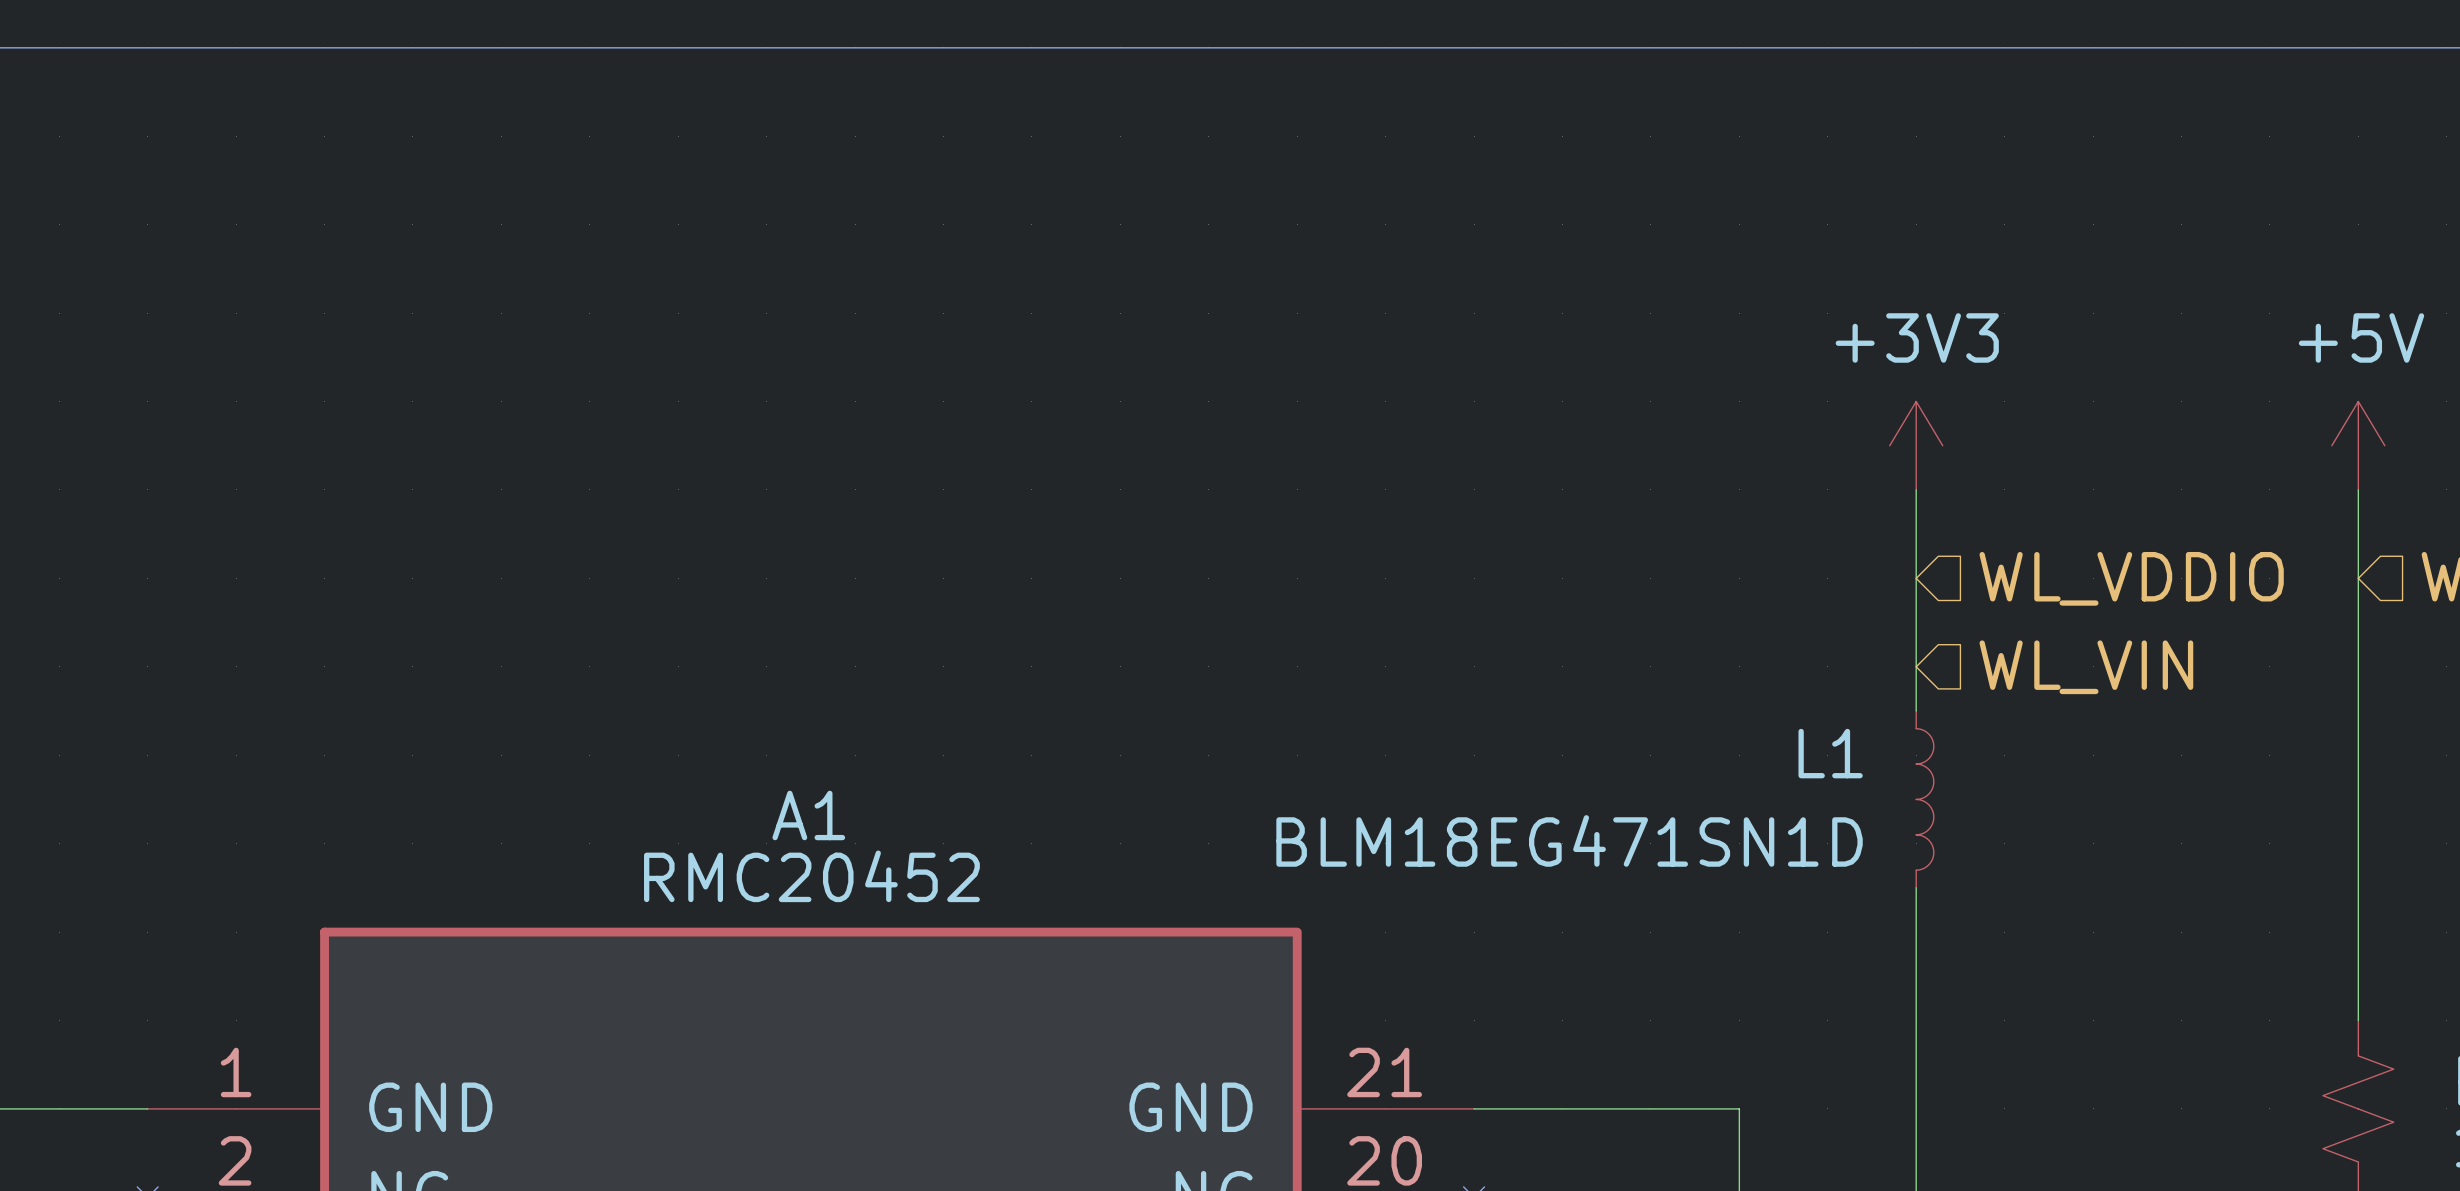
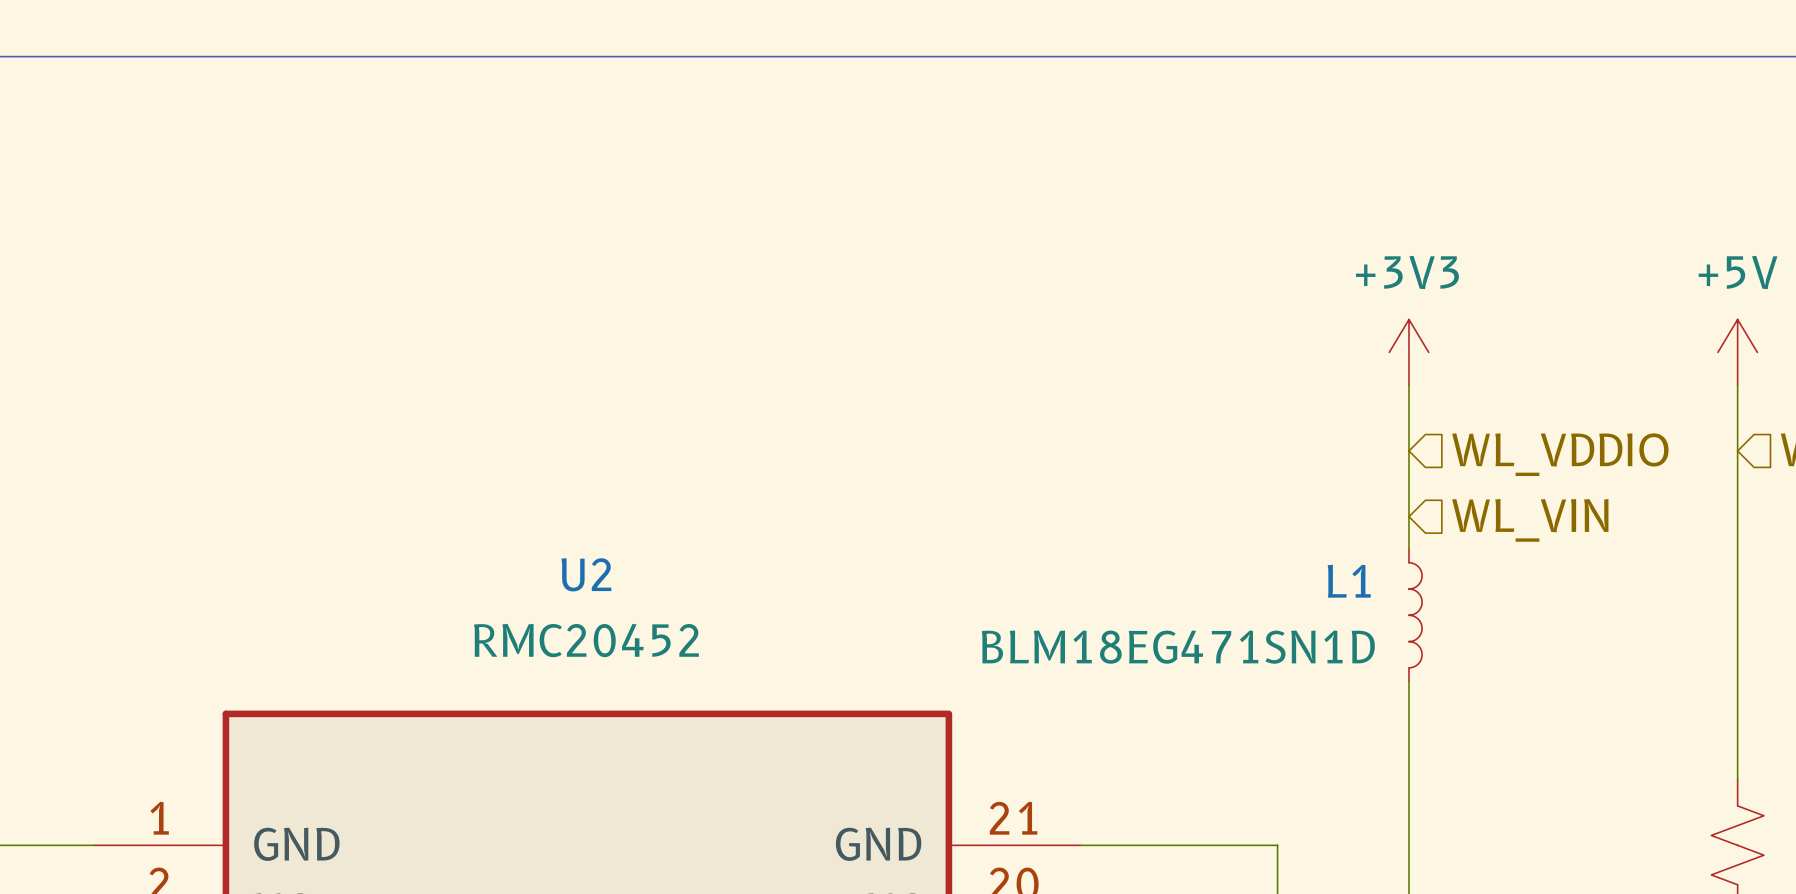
A1 name: A1 (808, 815) -> U2 (586, 574)
A1 value position: RMC20452 (811, 876) -> RMC20452 (586, 640)

